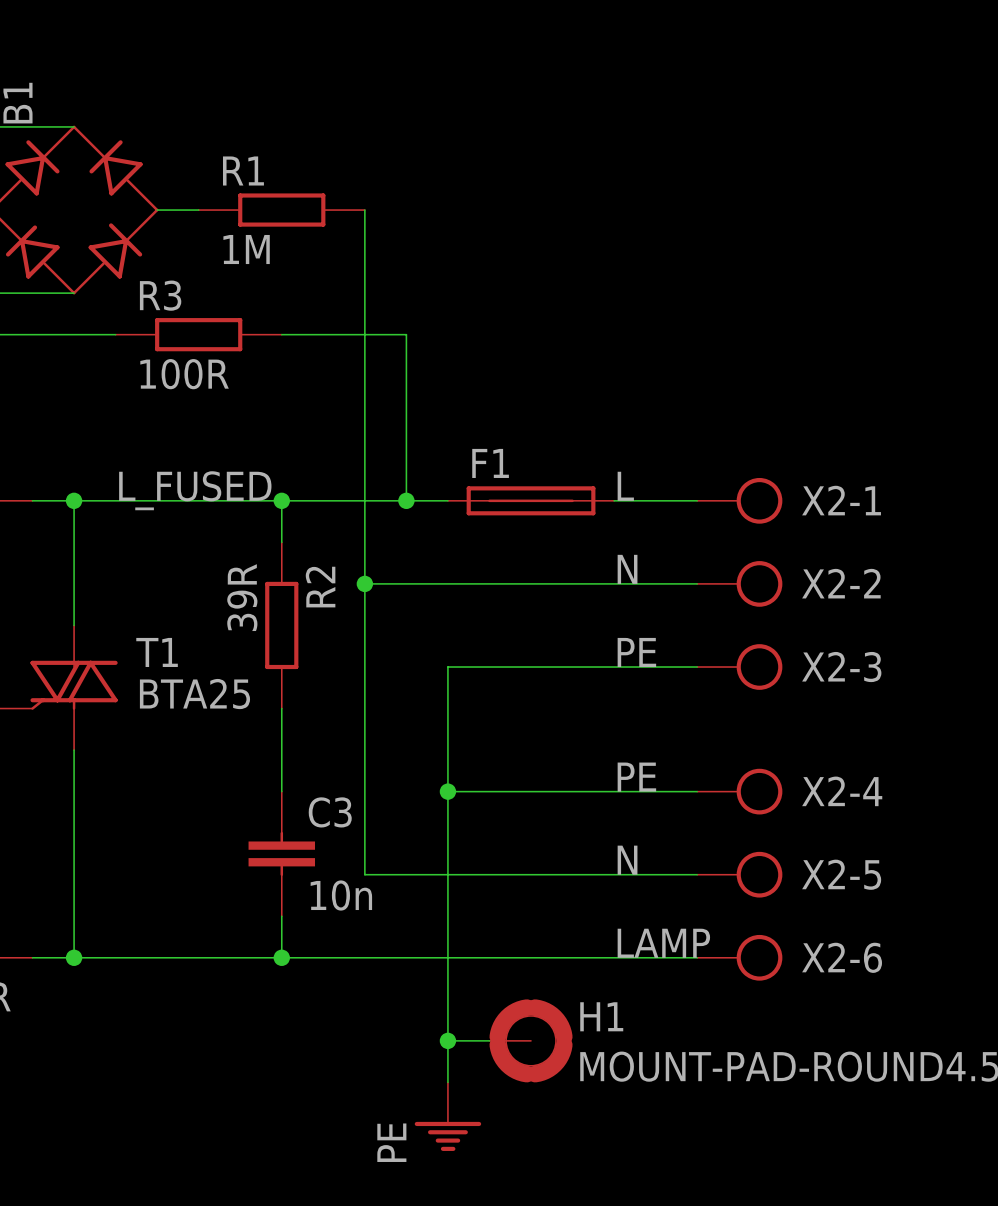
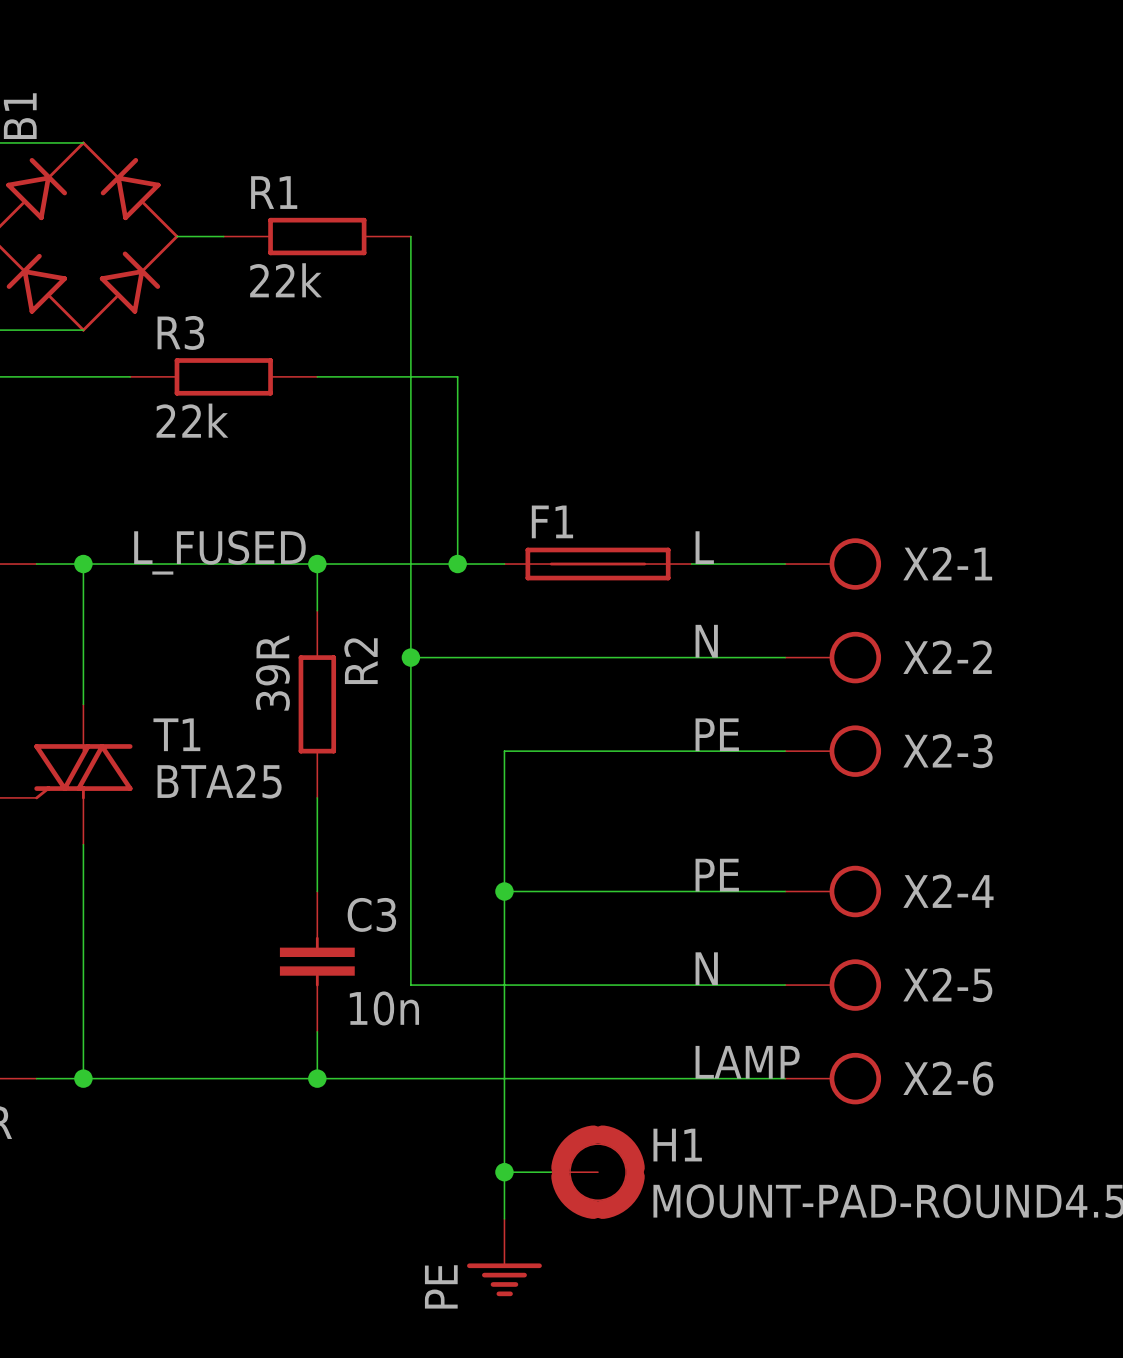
R1 value: 1M (246, 249) -> 22k (286, 280)
R3 value: 100R (184, 374) -> 22k (192, 420)

